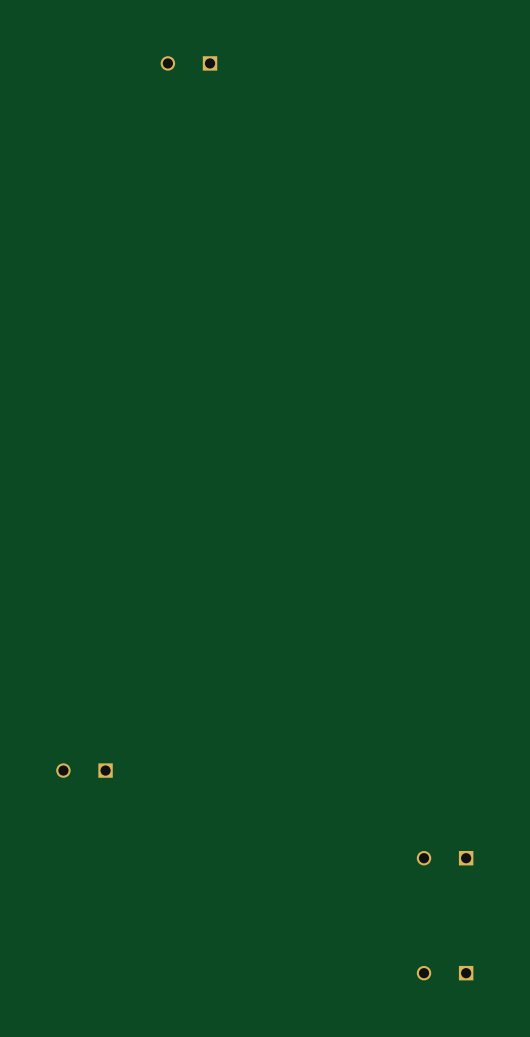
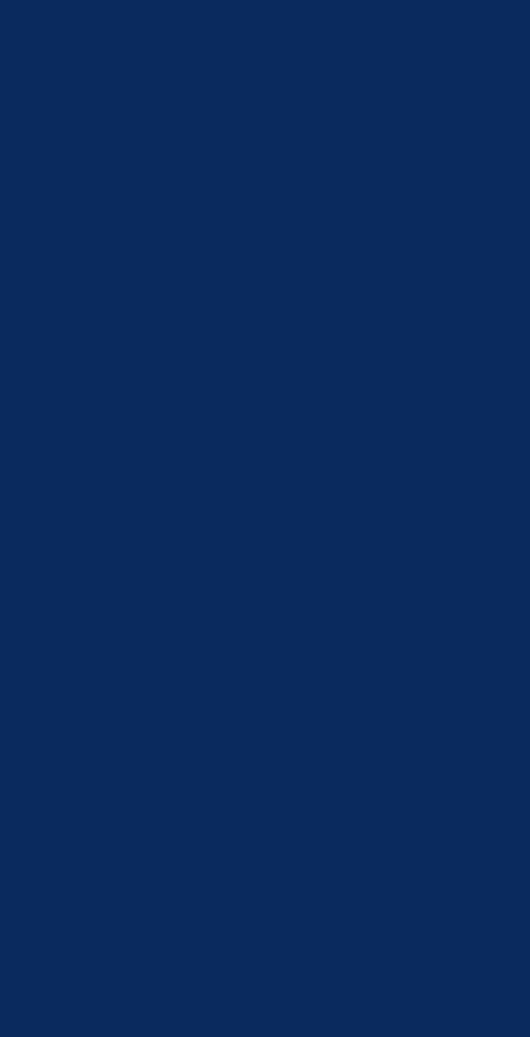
part: (188, 63) -> none
part: (84, 770) -> none
part: (445, 858) -> none
part: (445, 973) -> none

